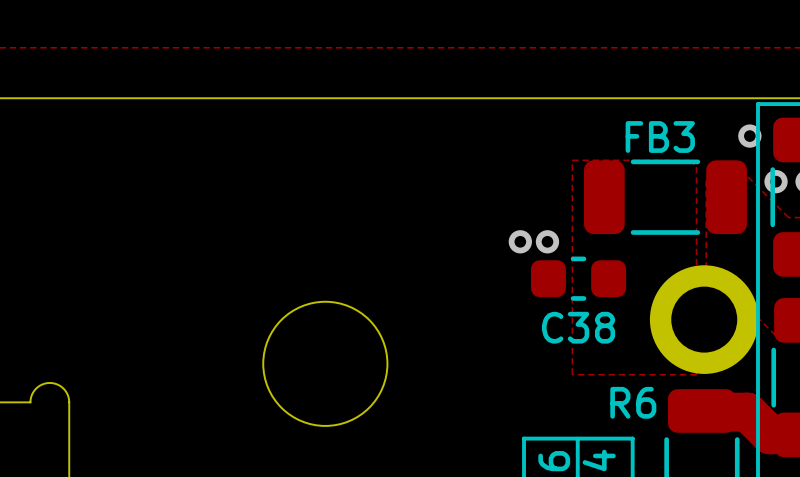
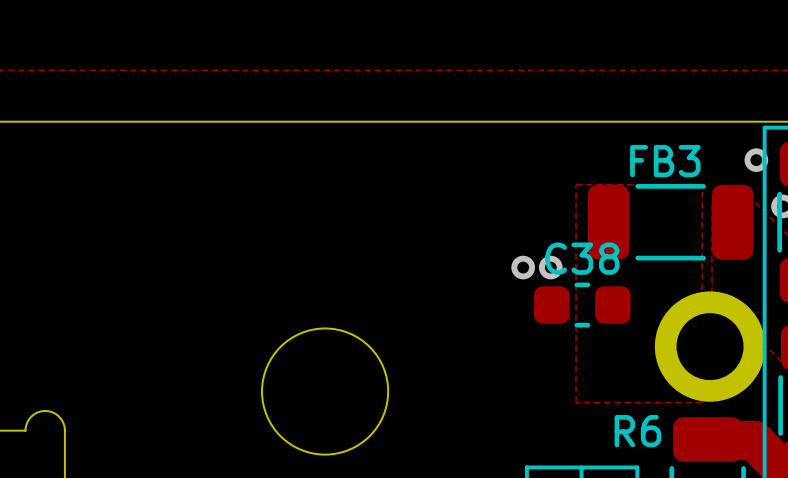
C38 name position: C38 (578, 327) -> C38 (582, 258)

